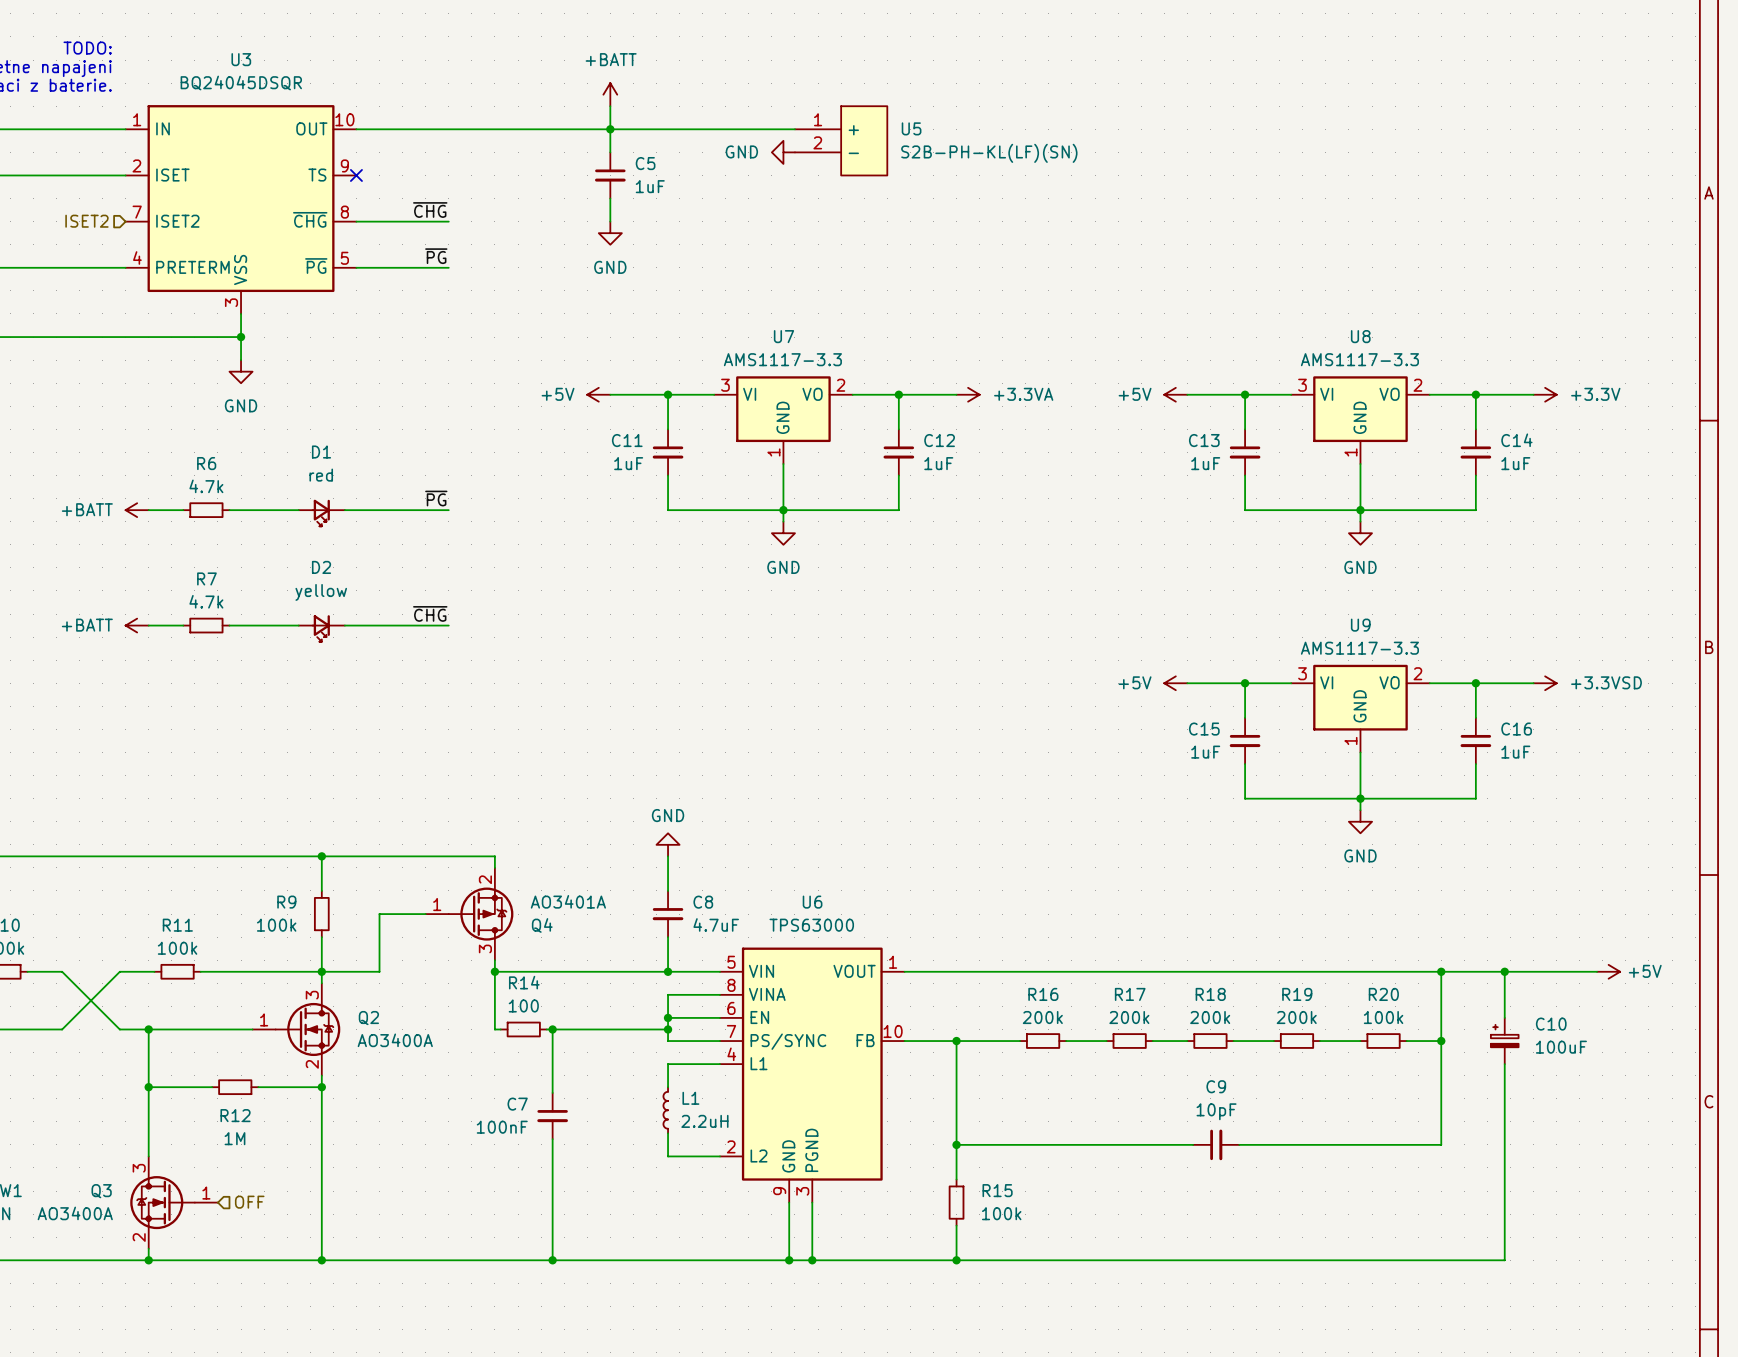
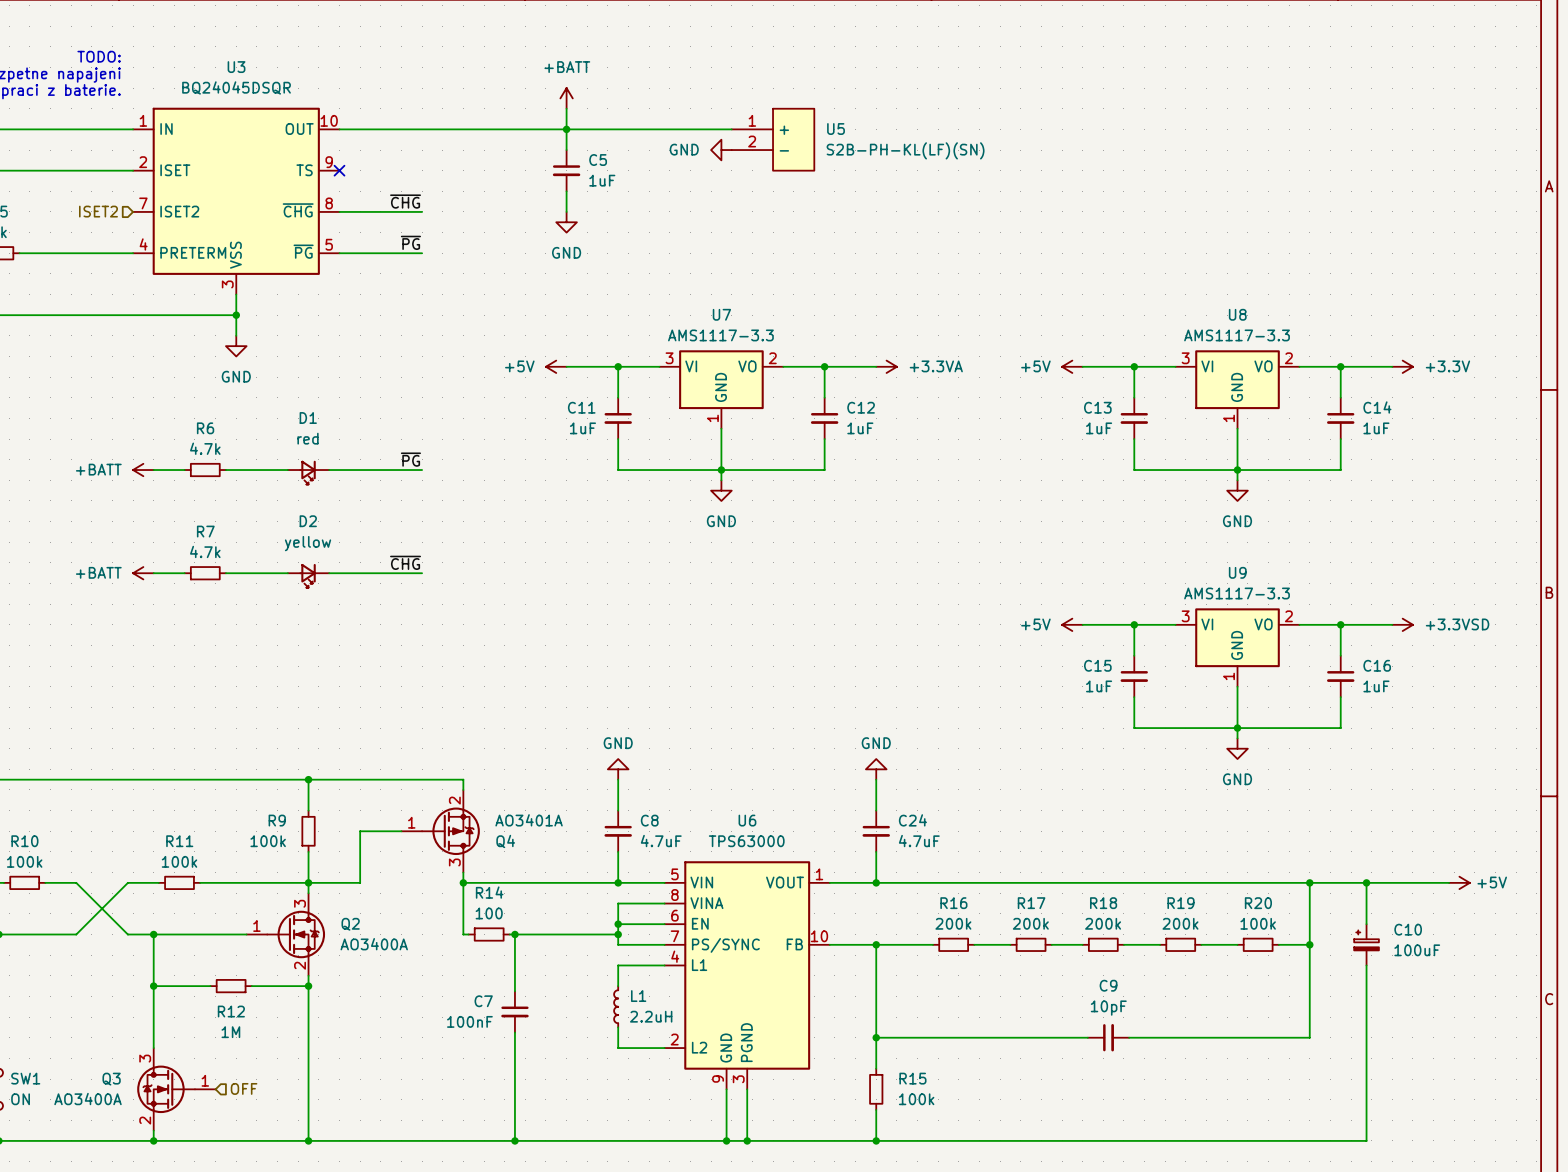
power symbol: none -> GND (876, 769)
wire: none -> (876, 779) (876, 810)
C24: none -> 4.7uF (876, 831)
wire: none -> (876, 851) (876, 882)
junction: none -> (876, 882)

